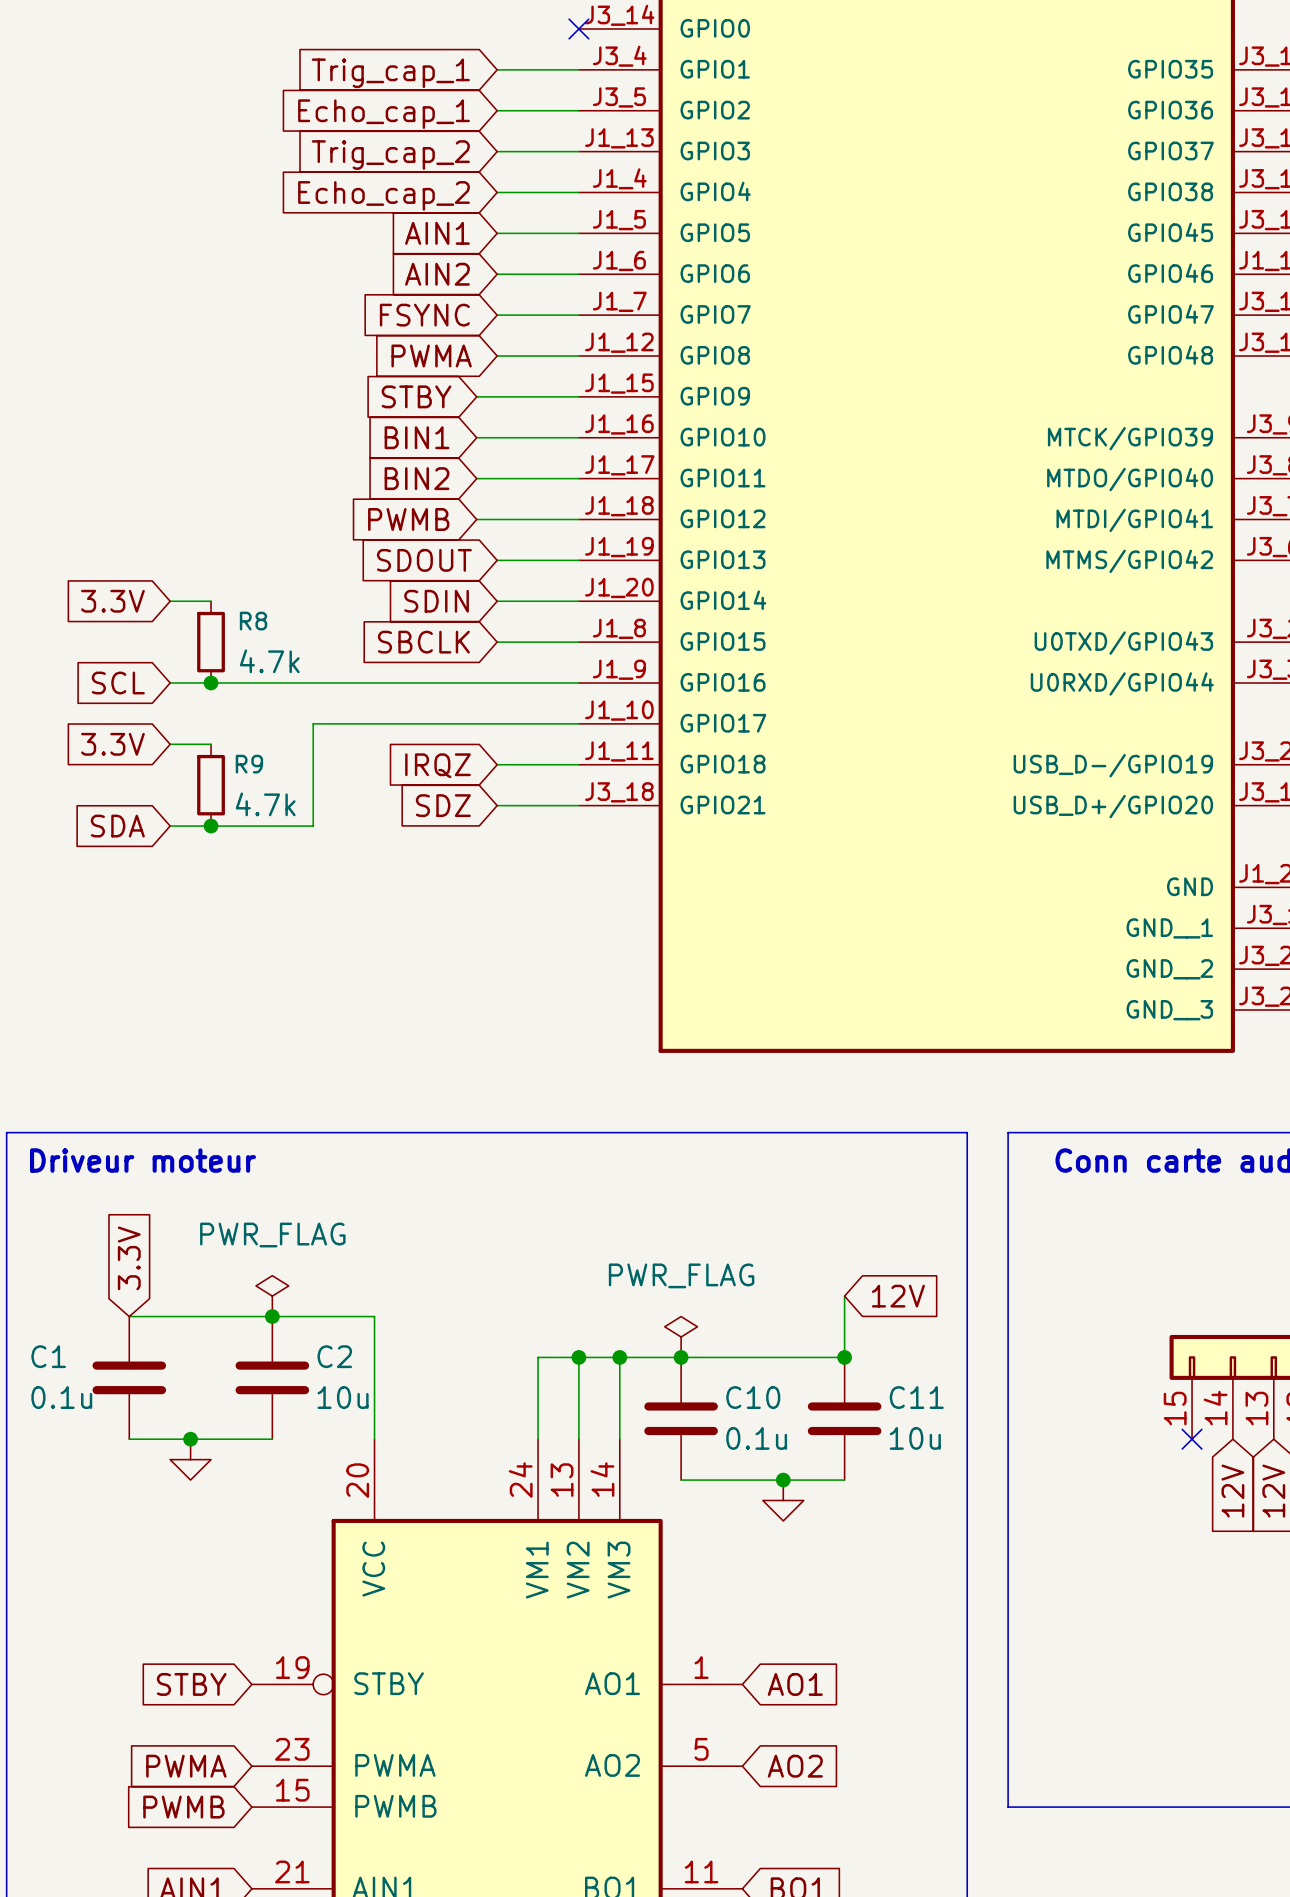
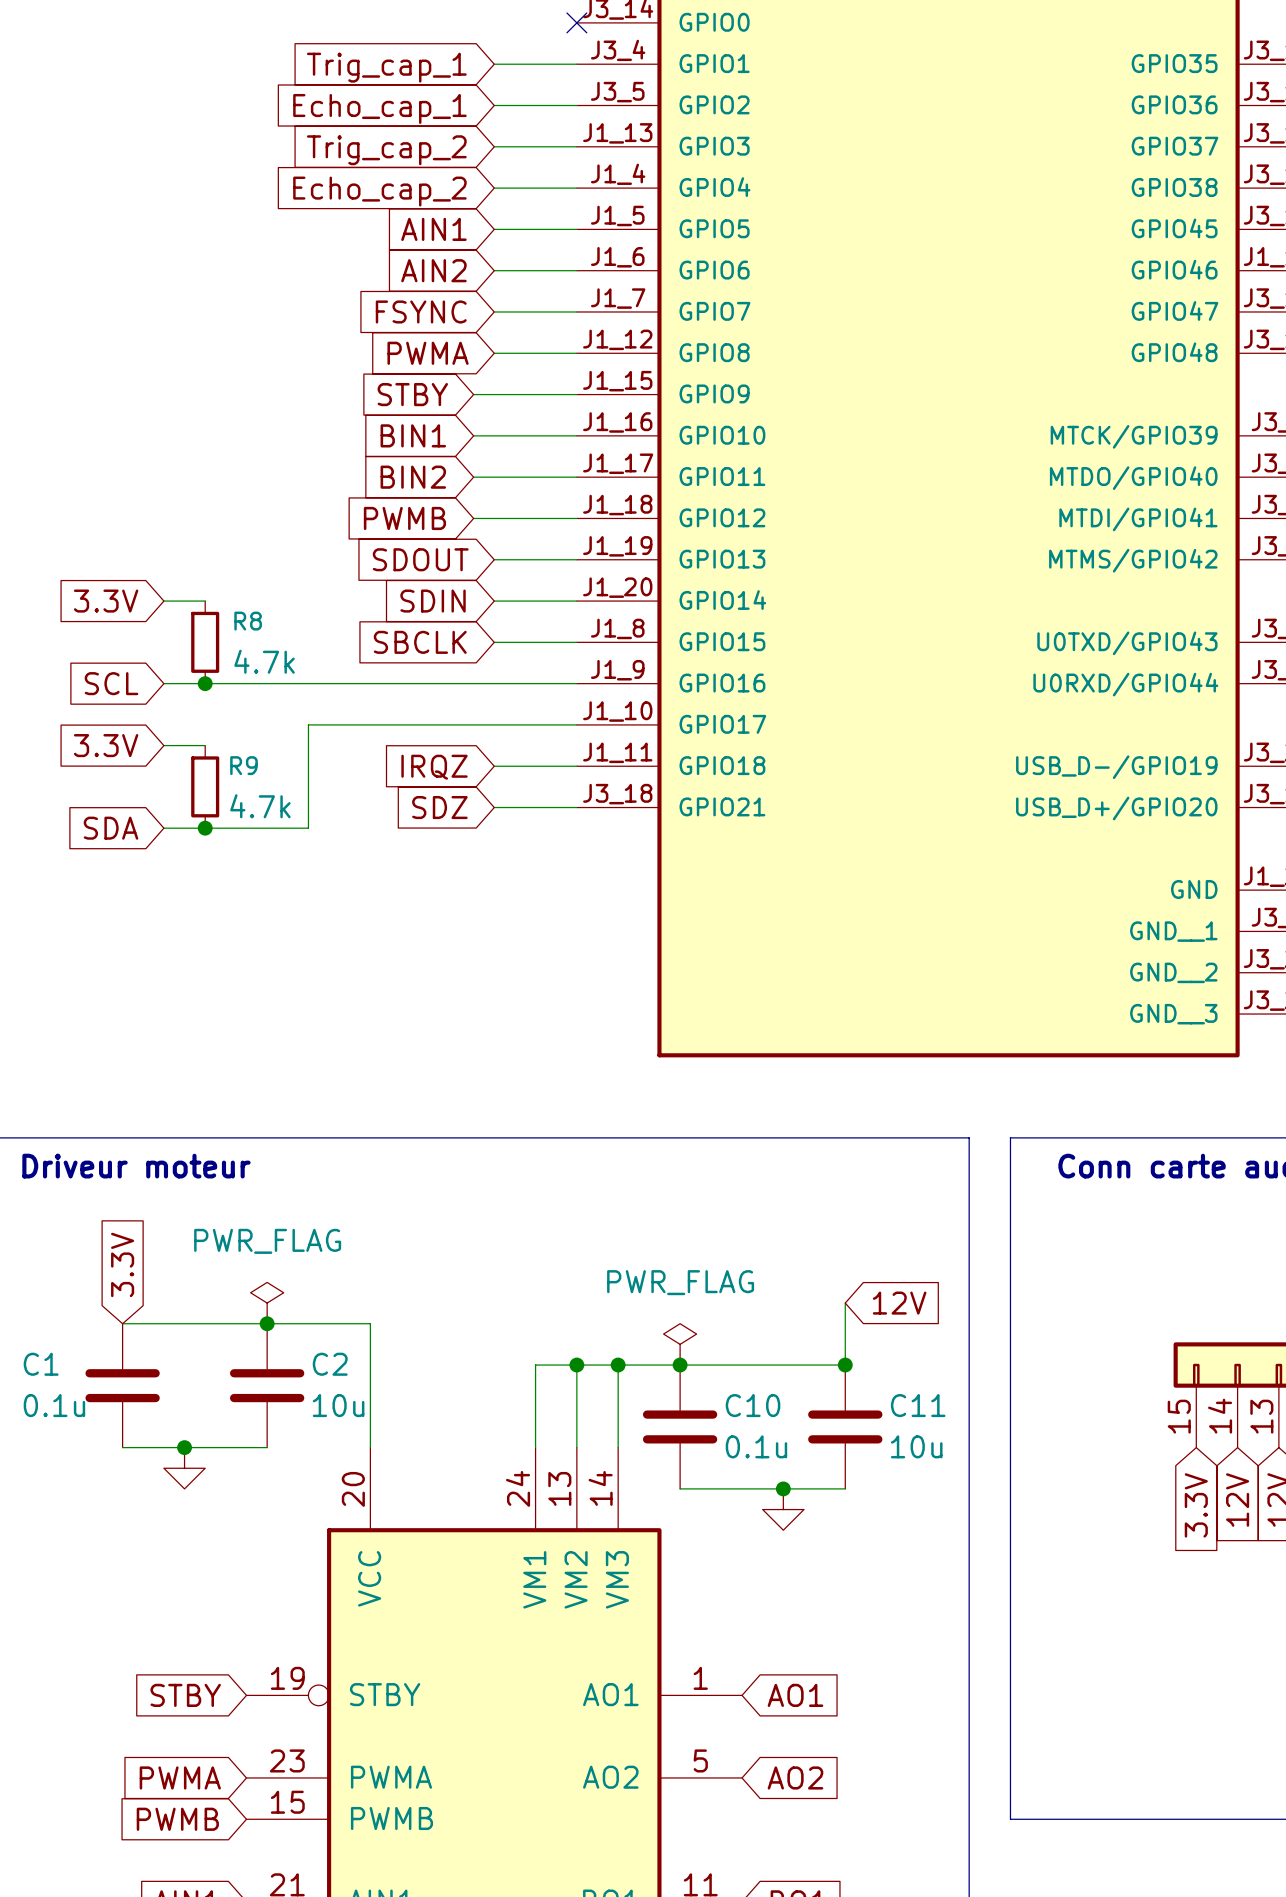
no-connect mark: (1192, 1439) -> none
global label: none -> 3.3V (1196, 1505)

